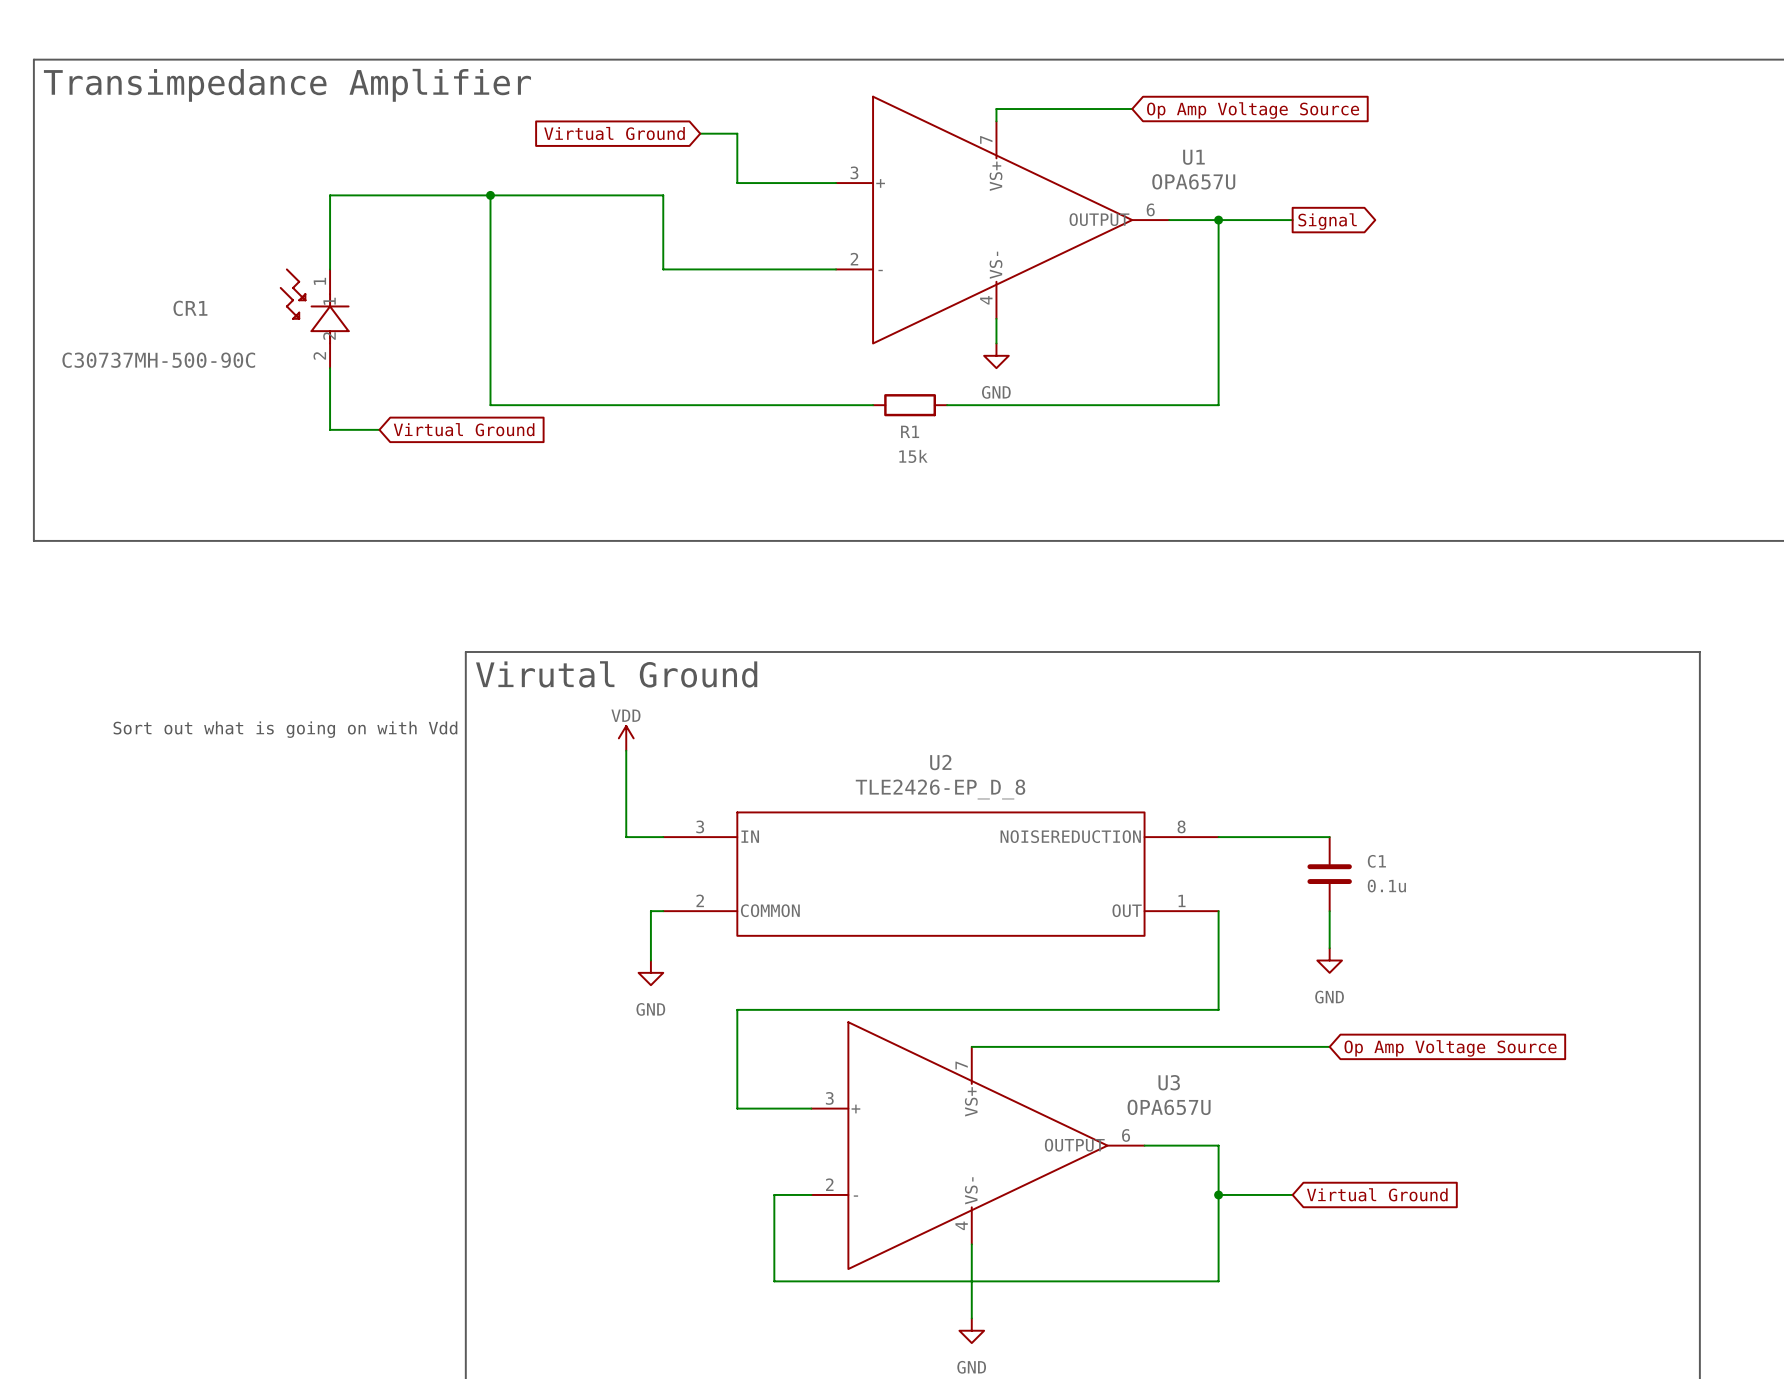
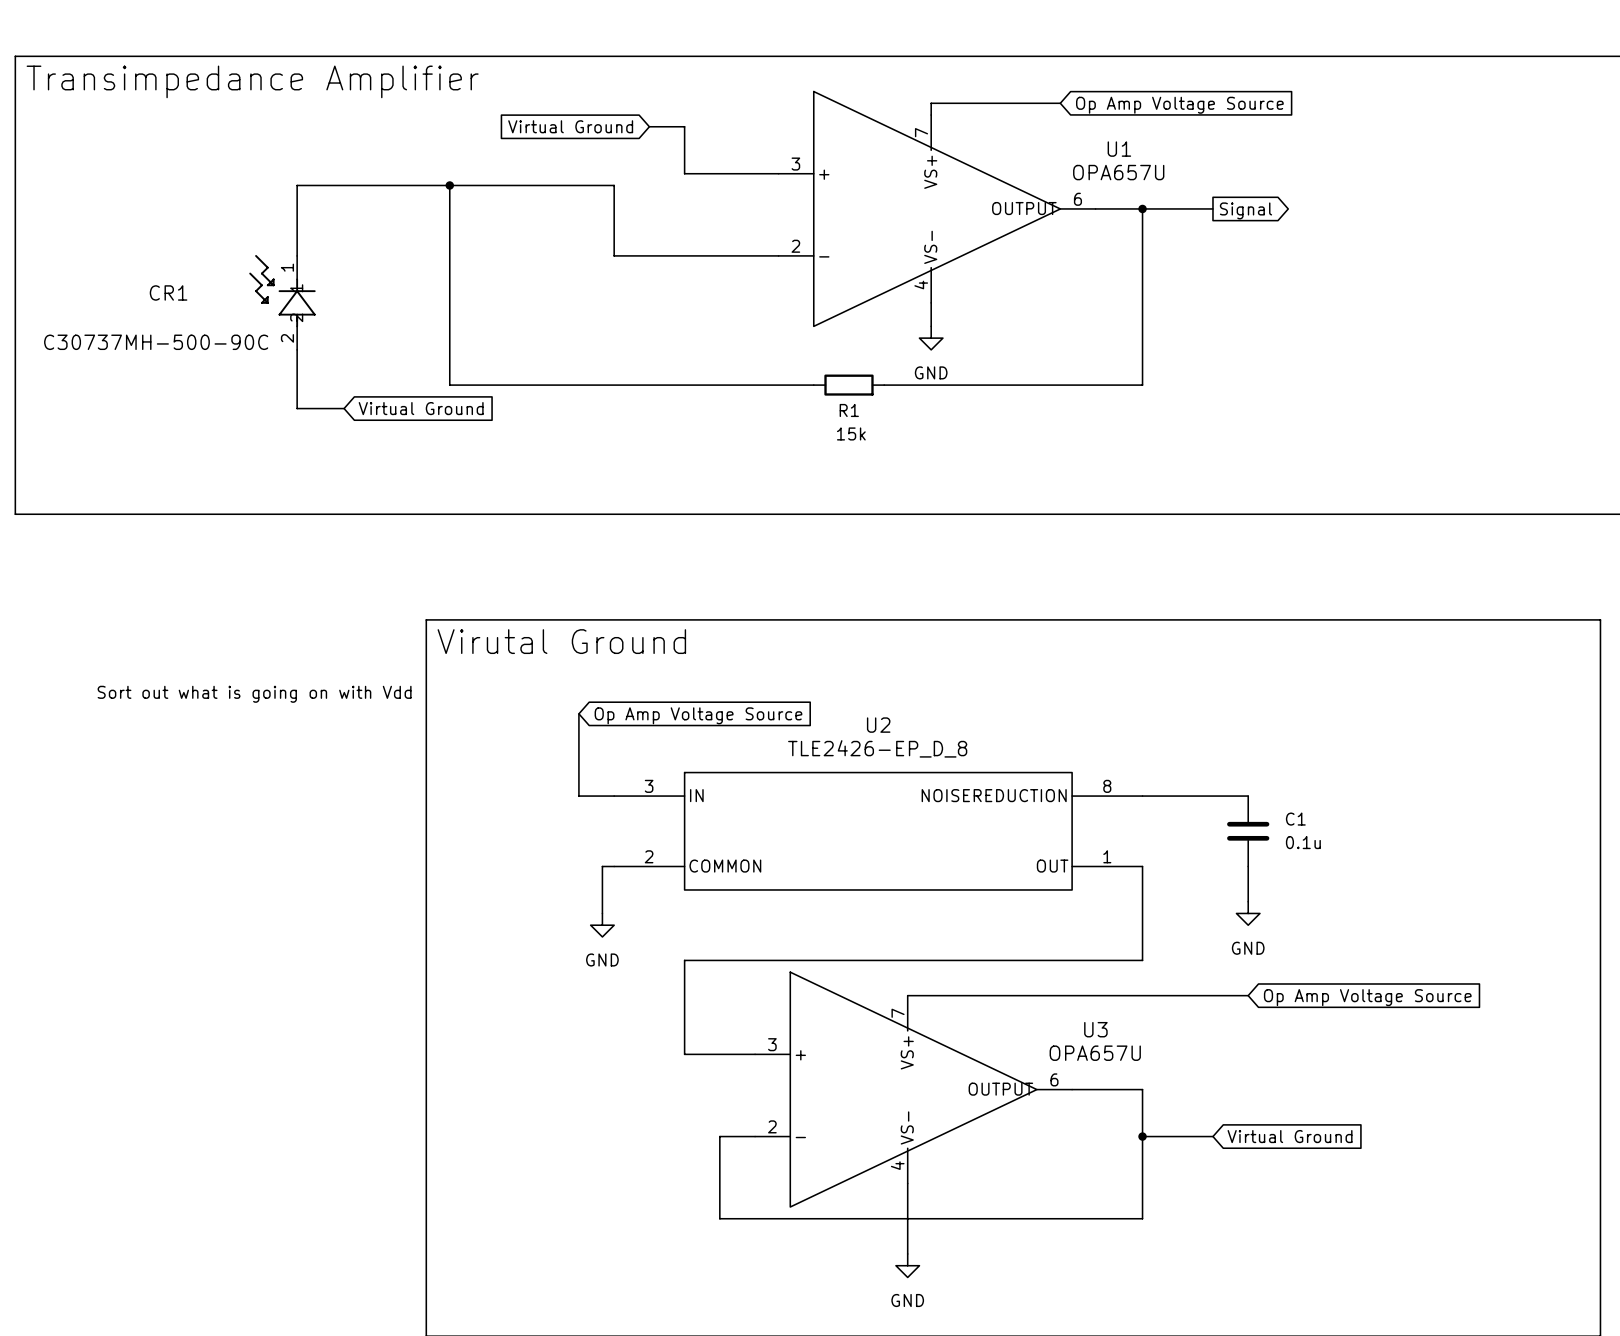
power symbol: VDD (626, 738) -> none
global label: none -> Op Amp Voltage Source (698, 715)

